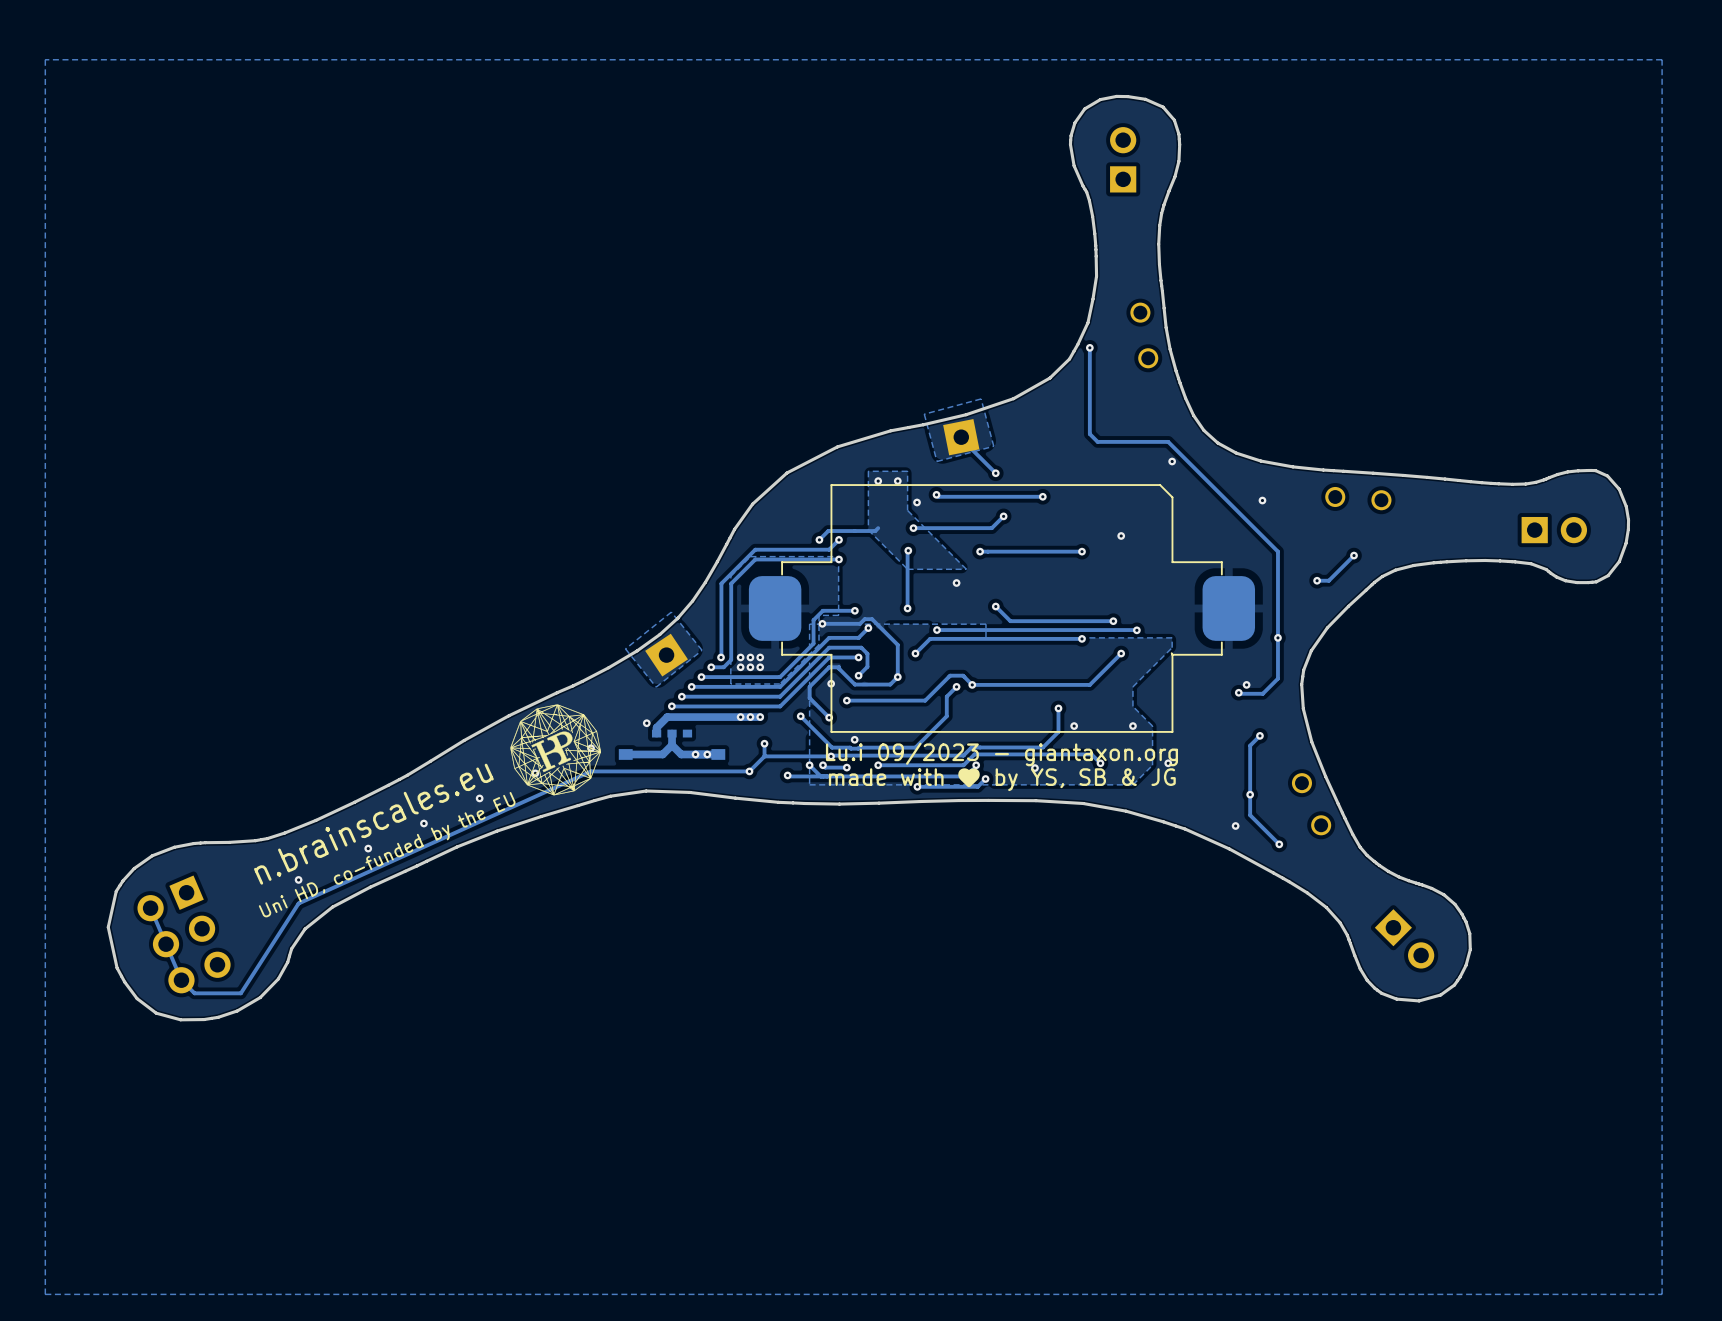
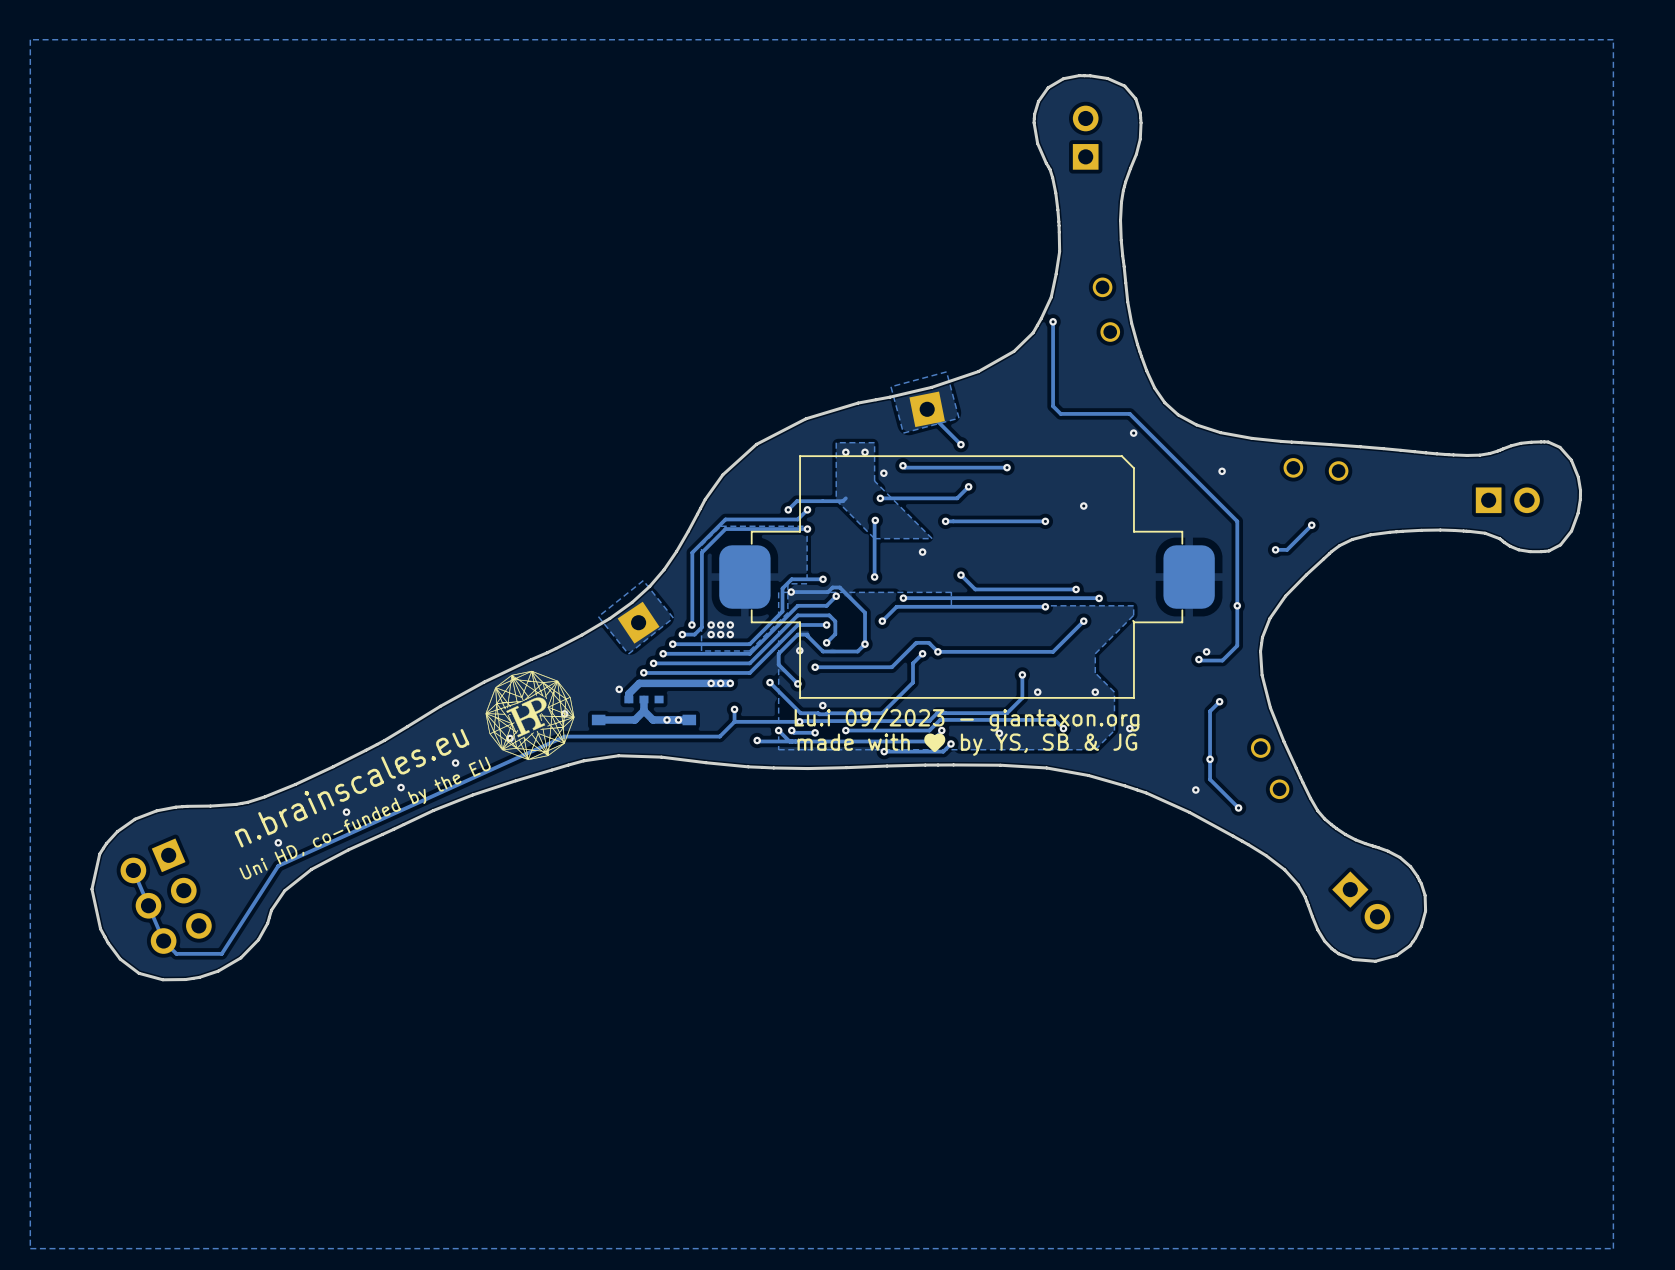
via: (749, 771) -> none

